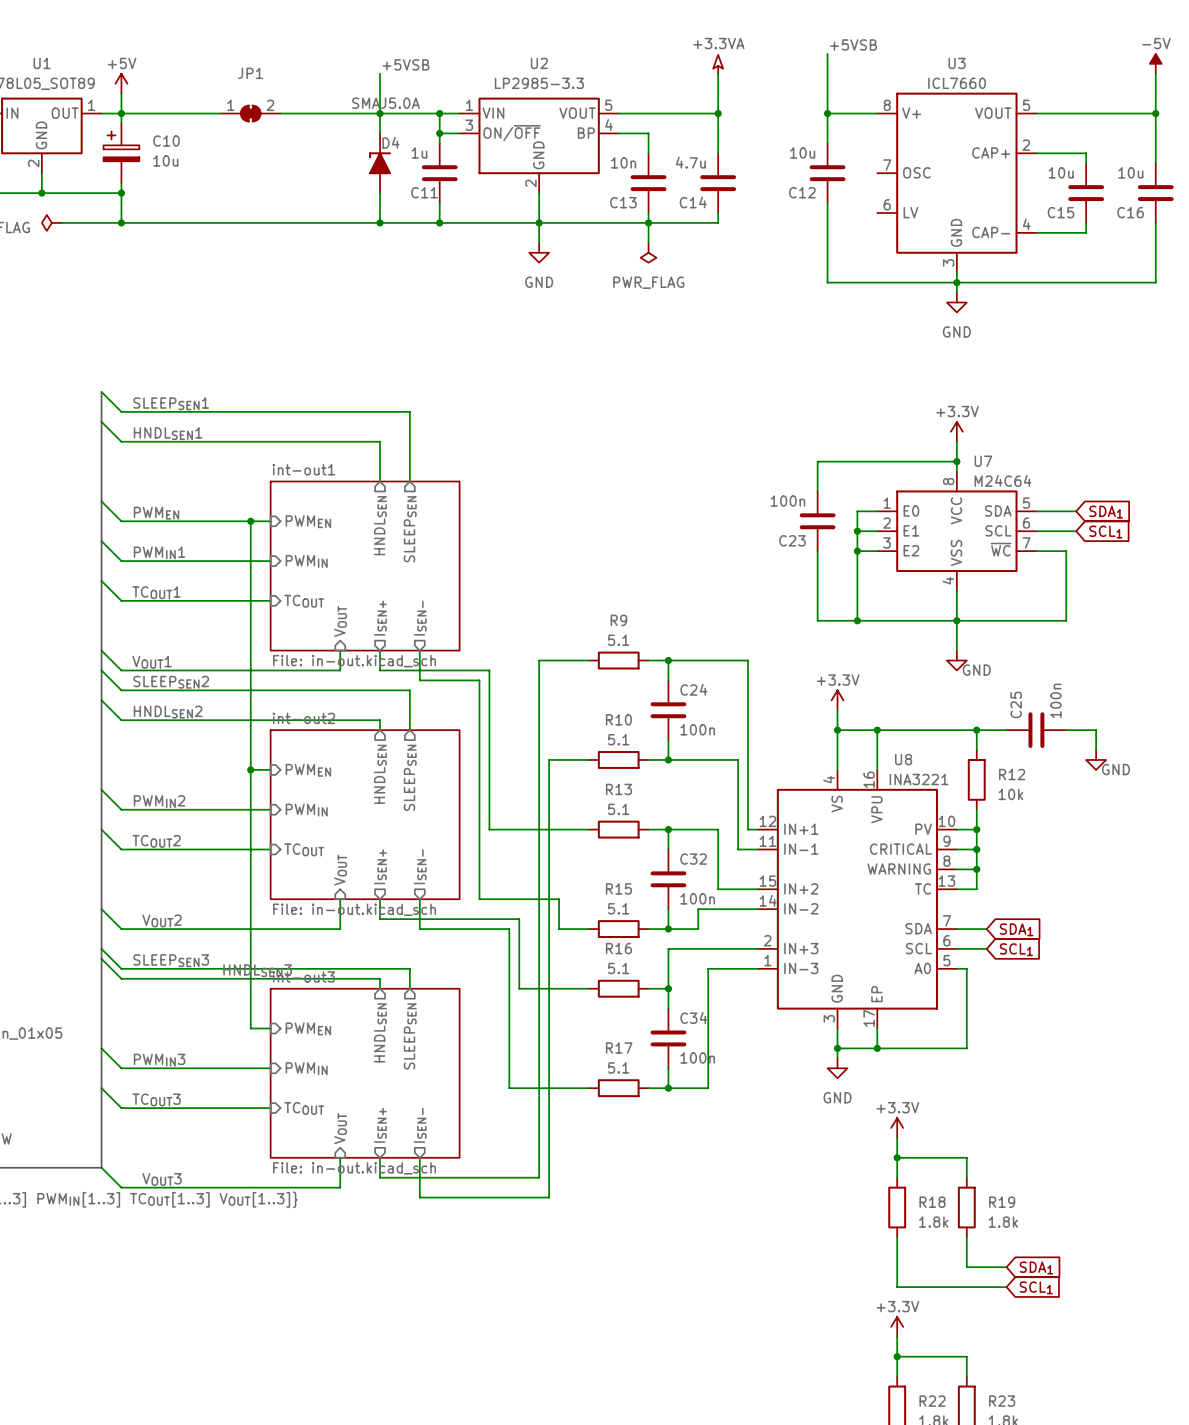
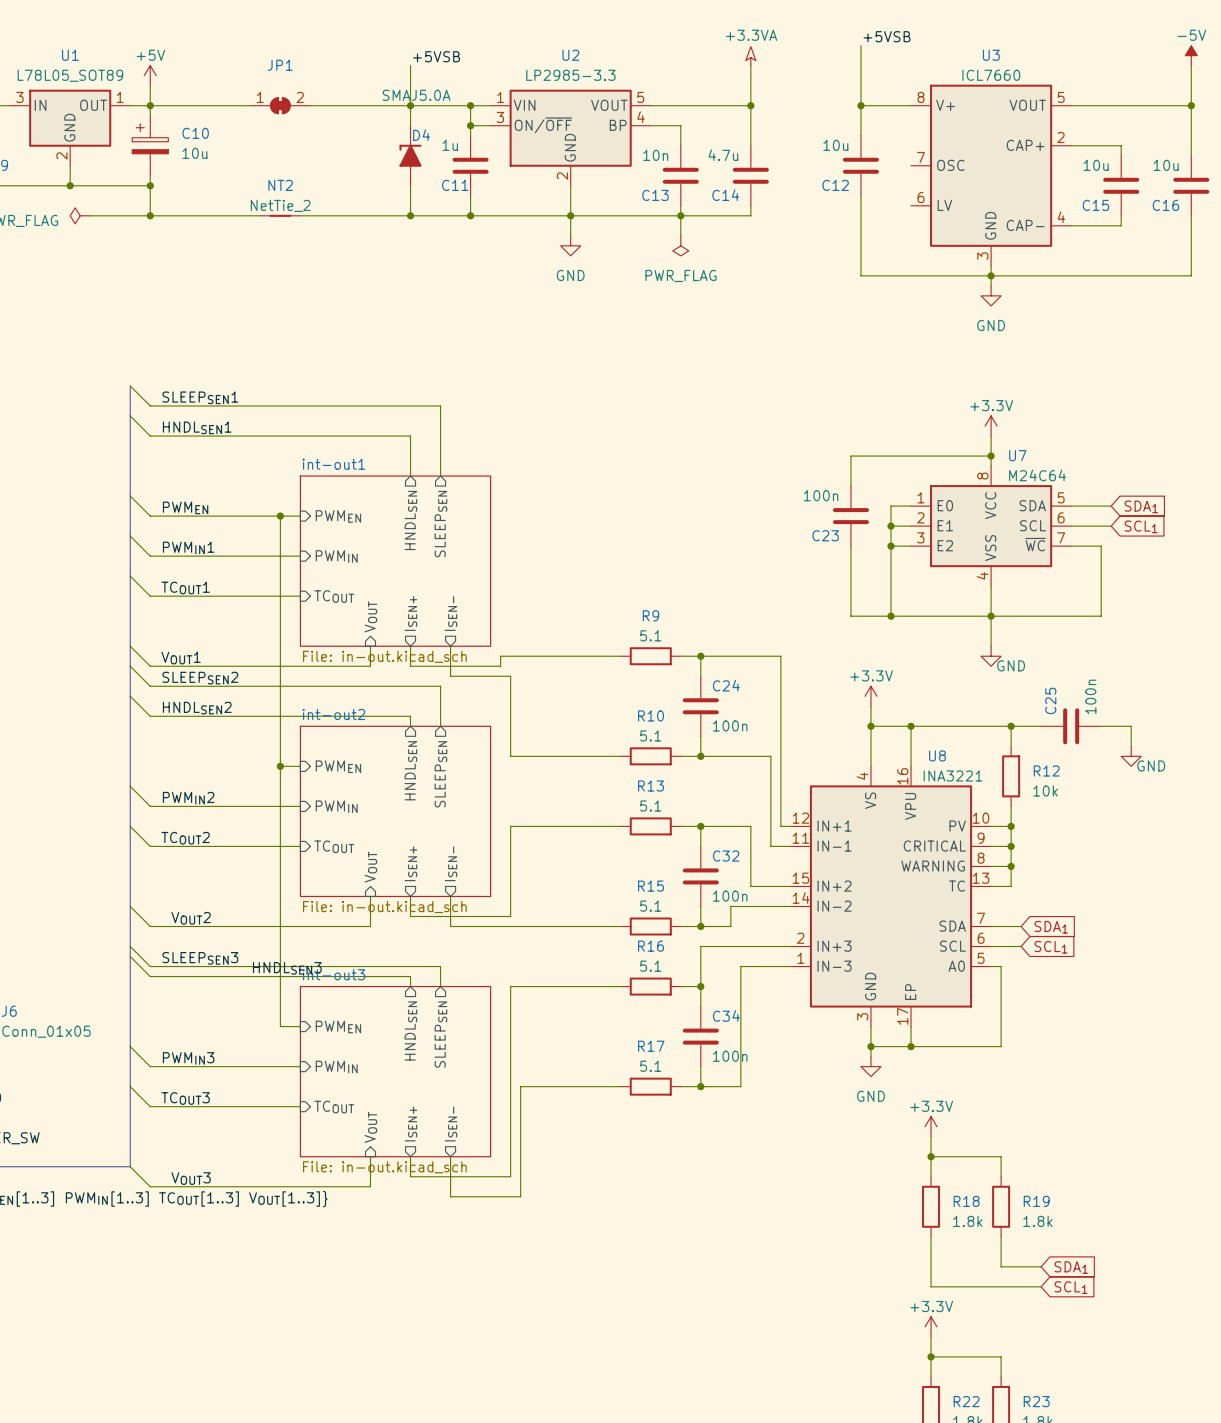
NT2: none -> NetTie_2 (280, 215)
wire: (539, 660) (539, 1177) (479, 1177) -> (550, 986) (510, 986) (510, 1176)
wire: (469, 670) (489, 670) (489, 829) -> (500, 666) (500, 656) (570, 656)
wire: (479, 759) (479, 829) -> (520, 826) (510, 826)
wire: (549, 759) (549, 1197) (489, 1197) -> (580, 756) (510, 756)
wire: (479, 899) (559, 899) (559, 929) -> (540, 926) (590, 926)
wire: (479, 919) (519, 919) (519, 988) -> (510, 916) (510, 896)
wire: (509, 929) (509, 1088) -> (520, 1196) (520, 1086) (540, 1086)

